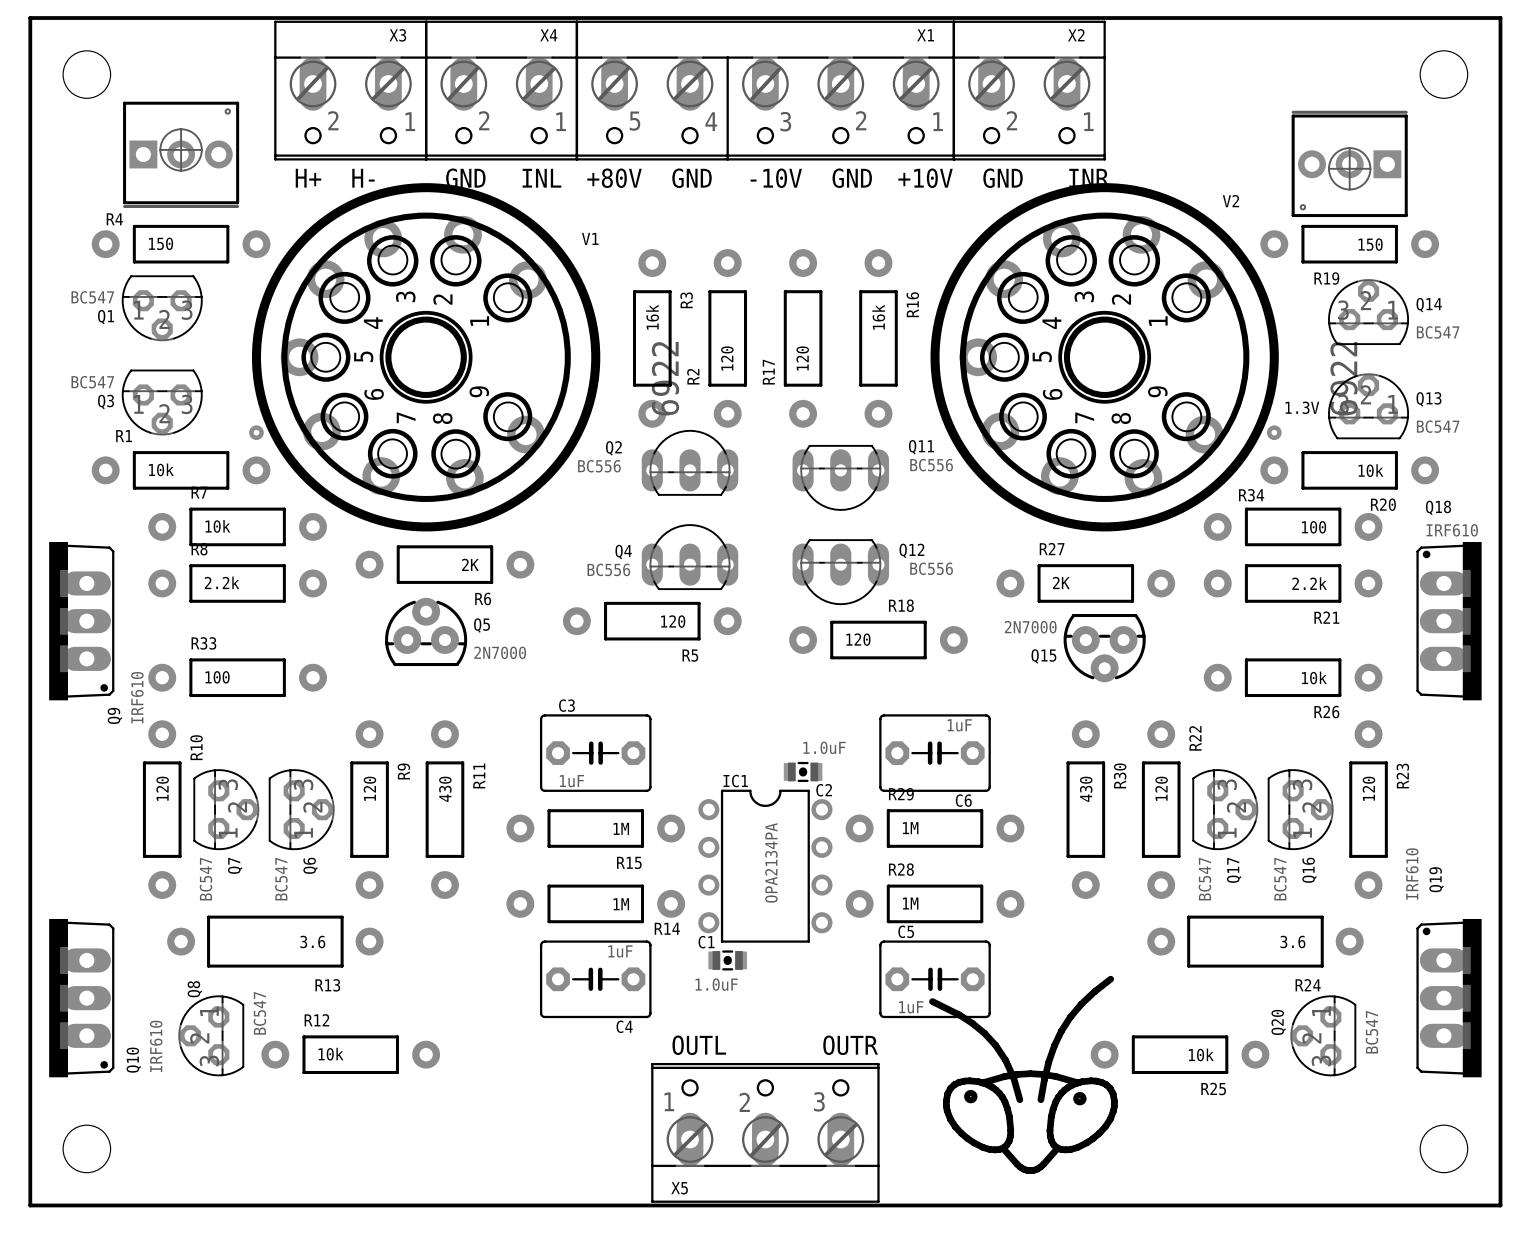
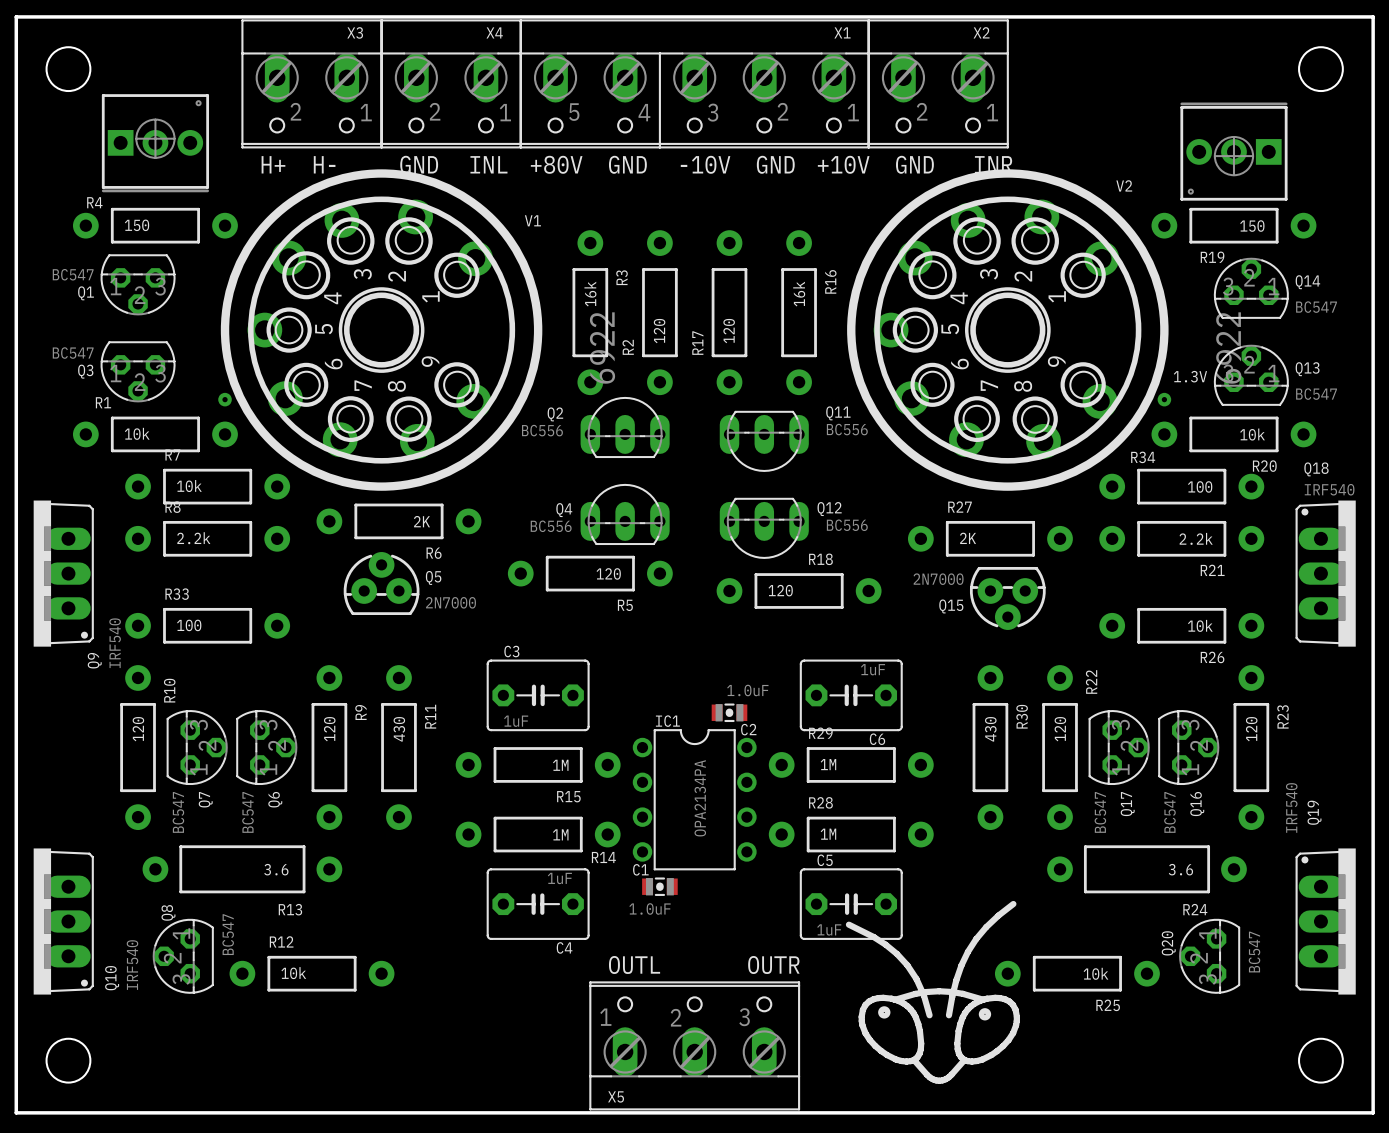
Q18 value: IRF610 (1452, 530) -> IRF540 (1329, 489)
Q9 value: IRF610 (137, 697) -> IRF540 (115, 643)
Q19 value: IRF610 (1412, 874) -> IRF540 (1291, 807)
Q10 value: IRF610 (156, 1046) -> IRF540 (132, 965)

